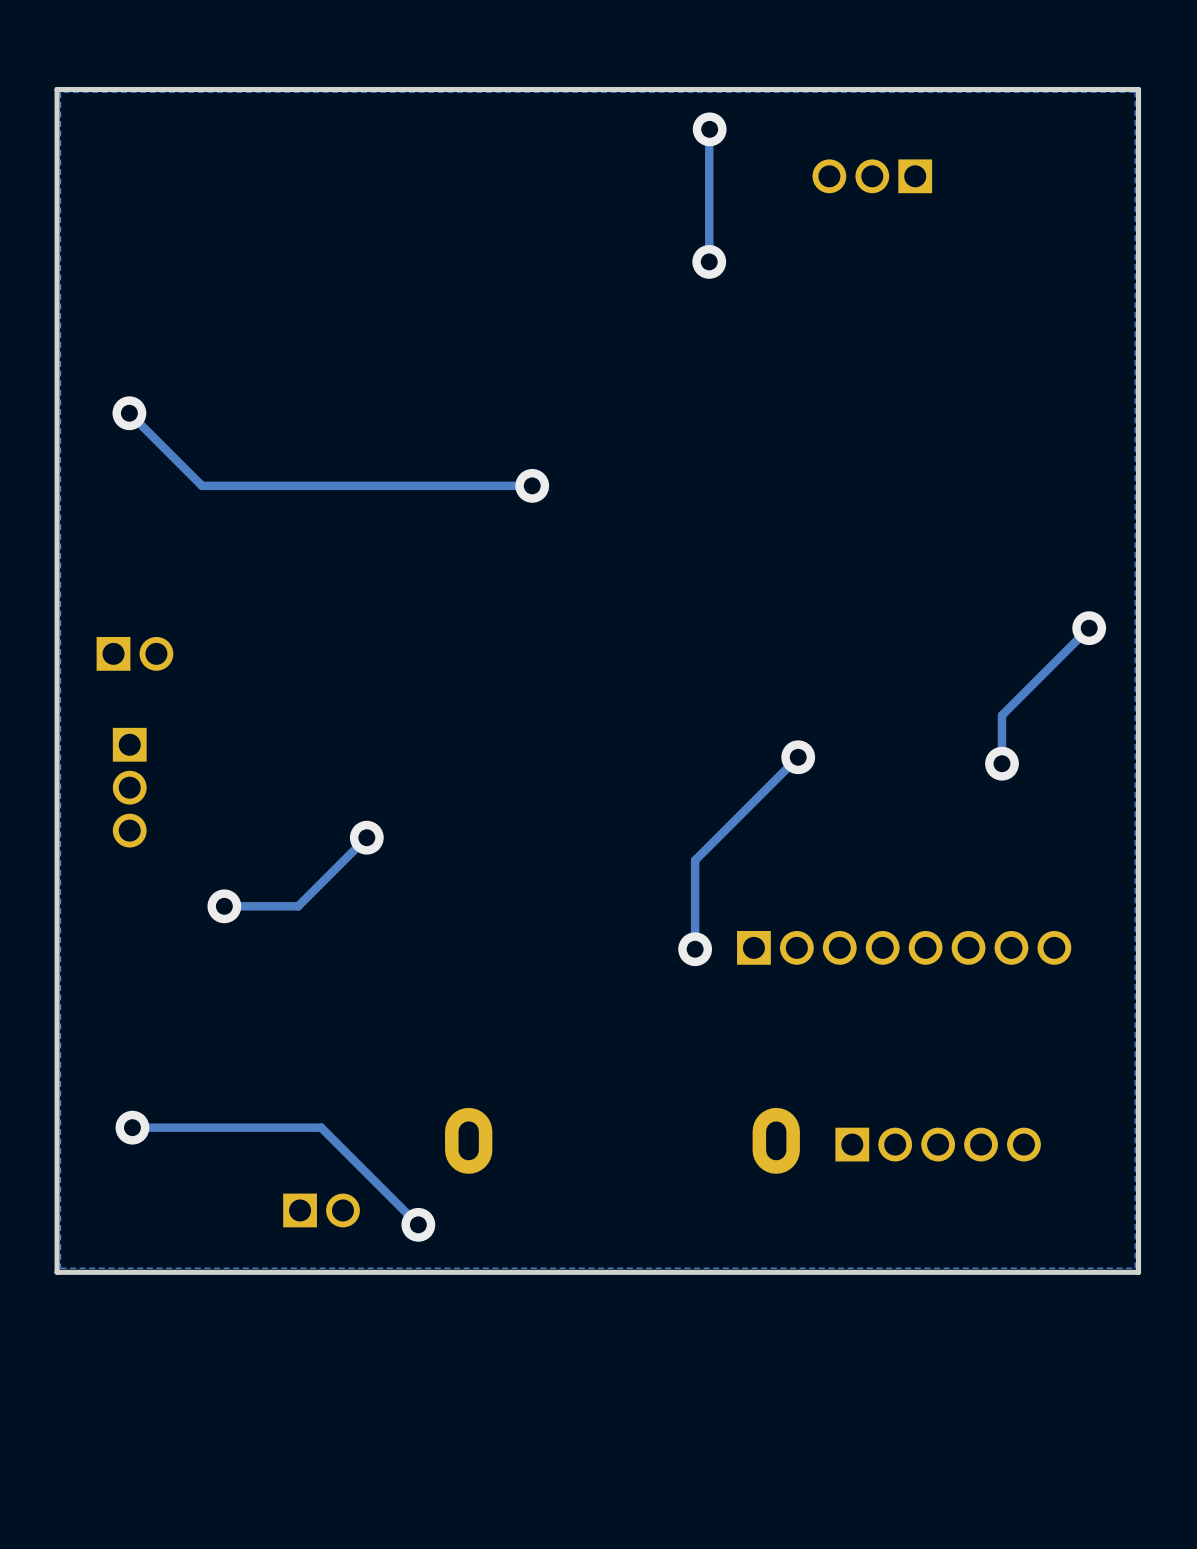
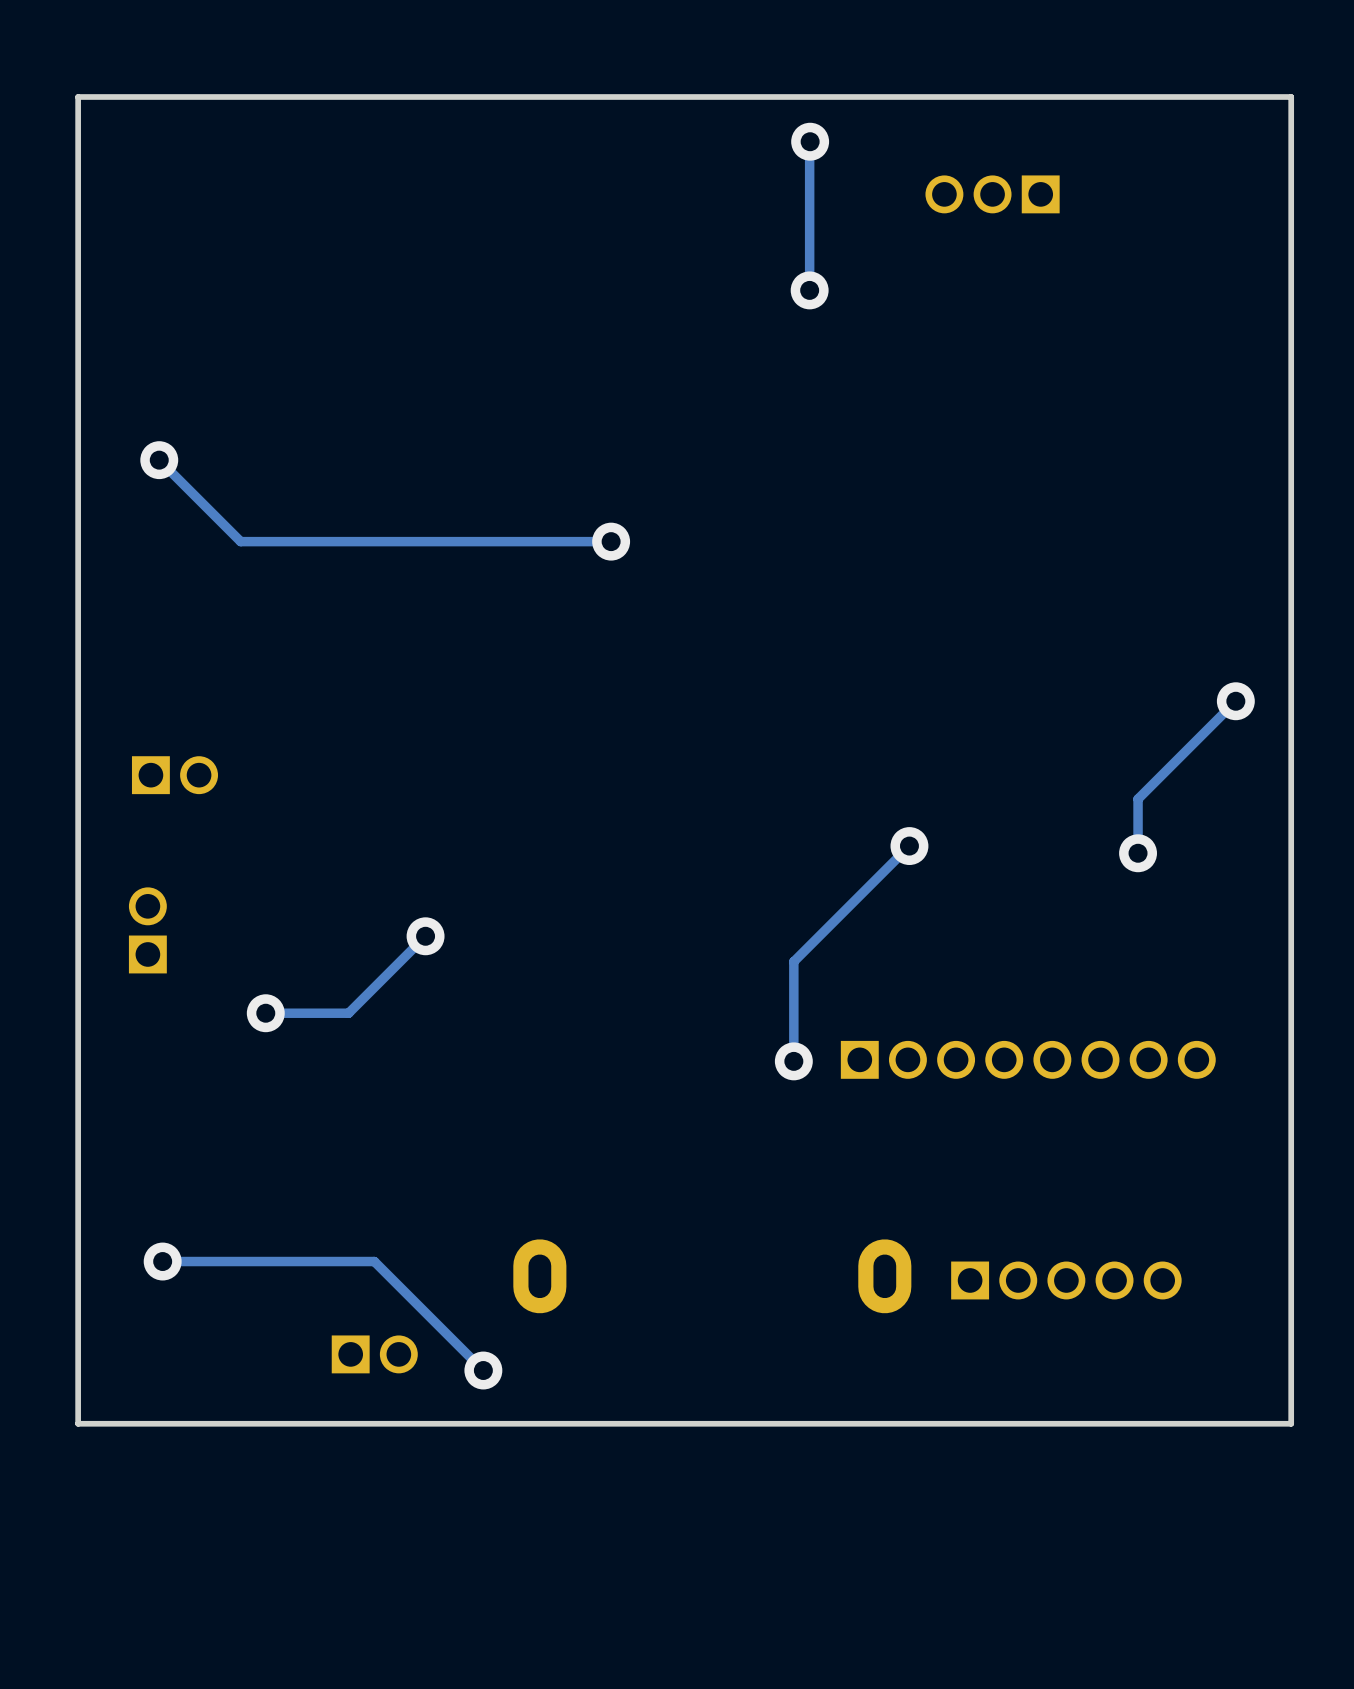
zone outline: (1135, 92) (60, 92) (60, 1268) (1135, 1268) (1135, 92) -> none
part position: (134, 653) -> (174, 775)
part: (129, 787) -> none
part: none -> (147, 930)

